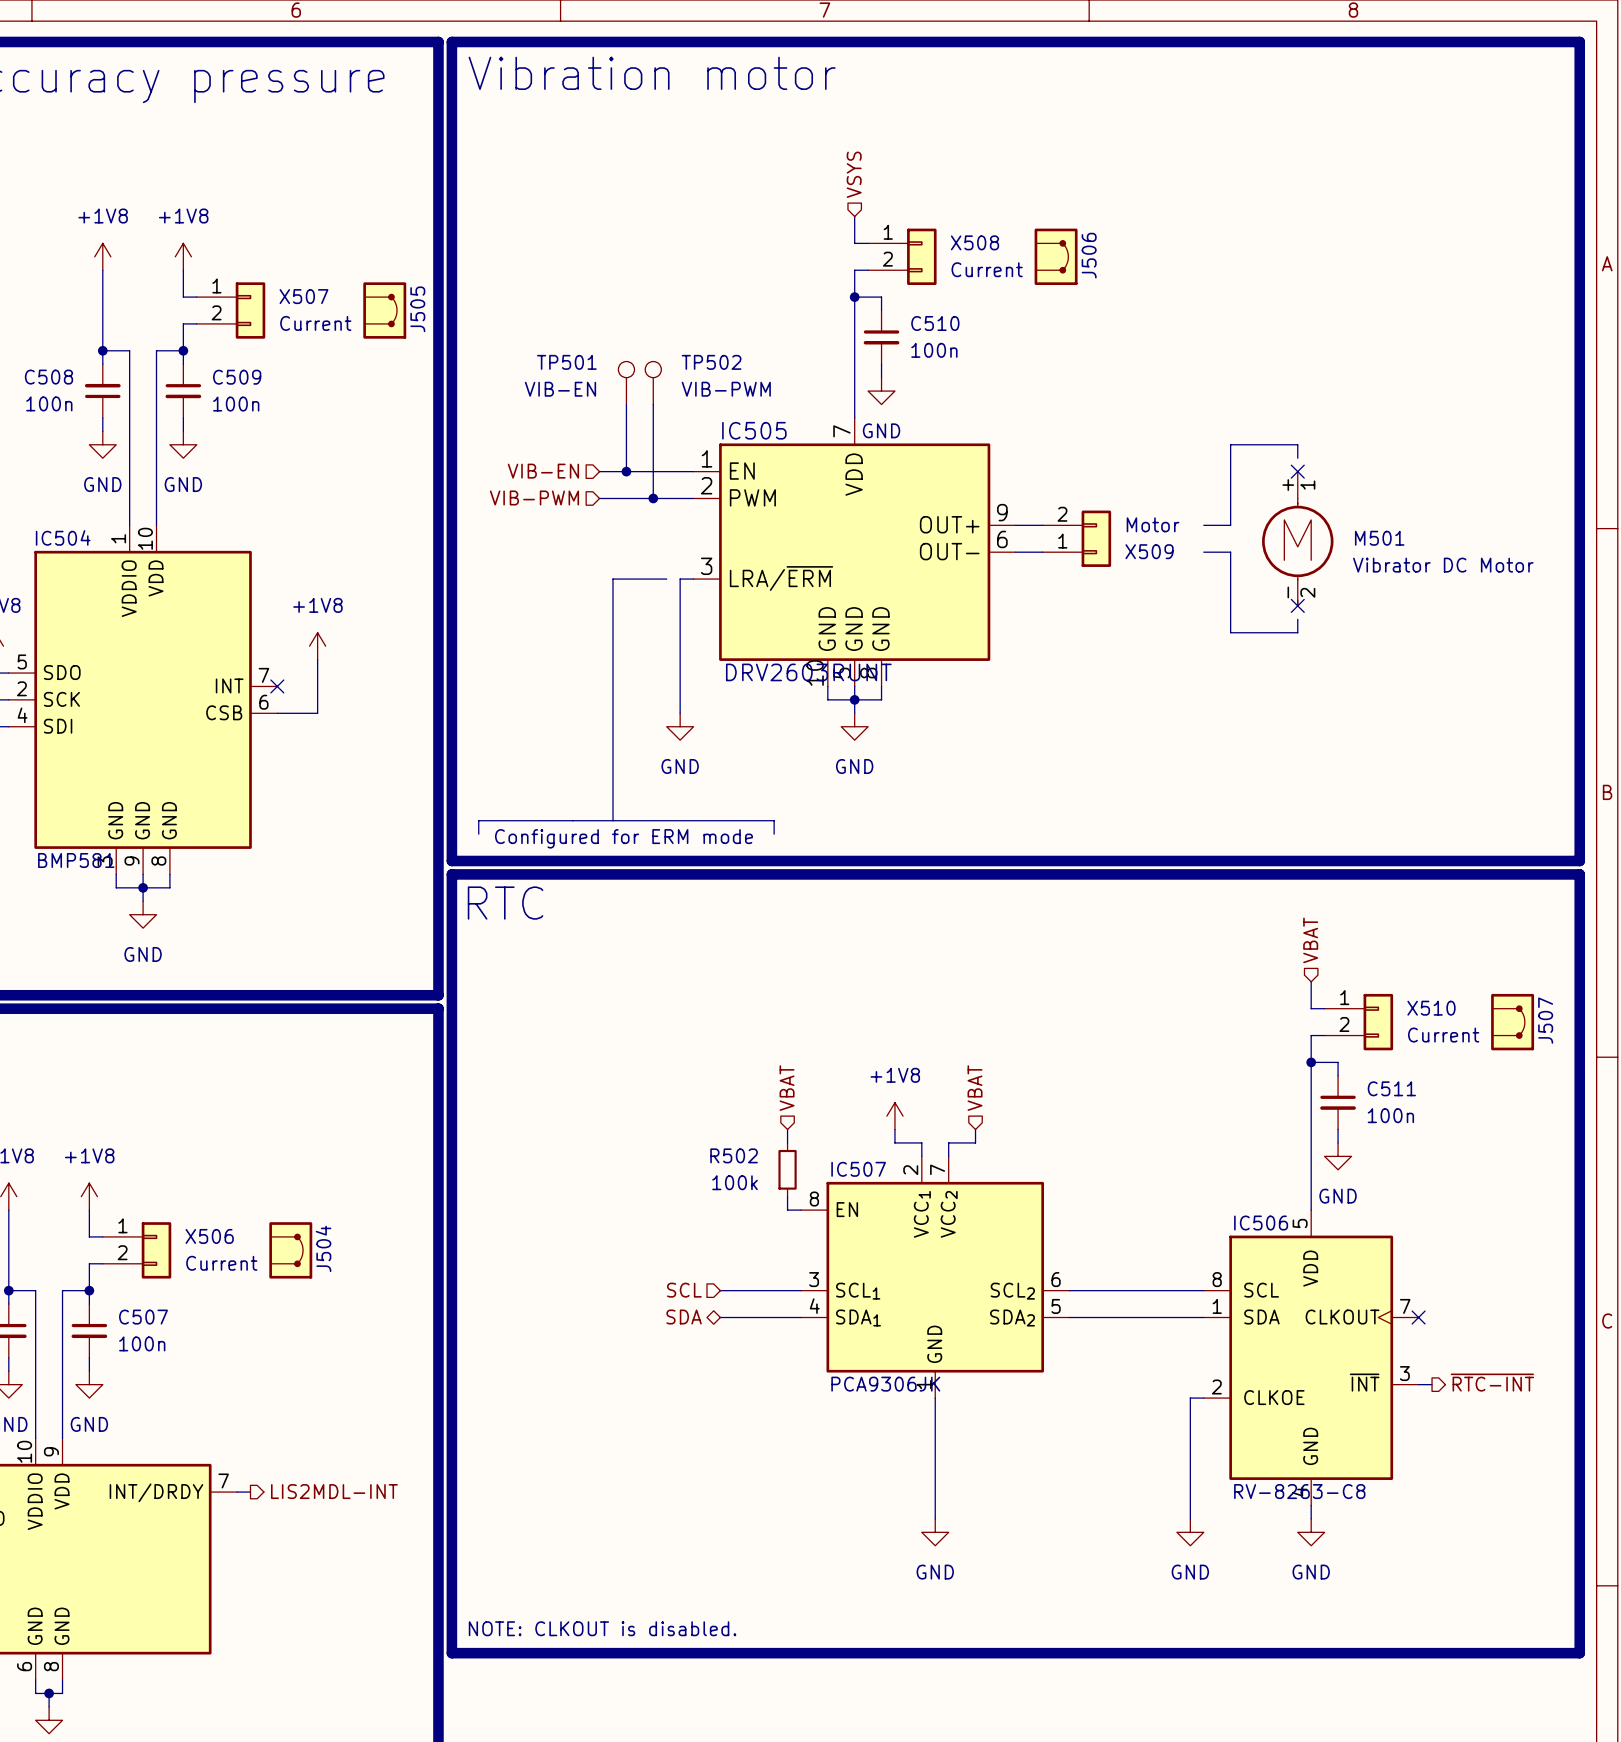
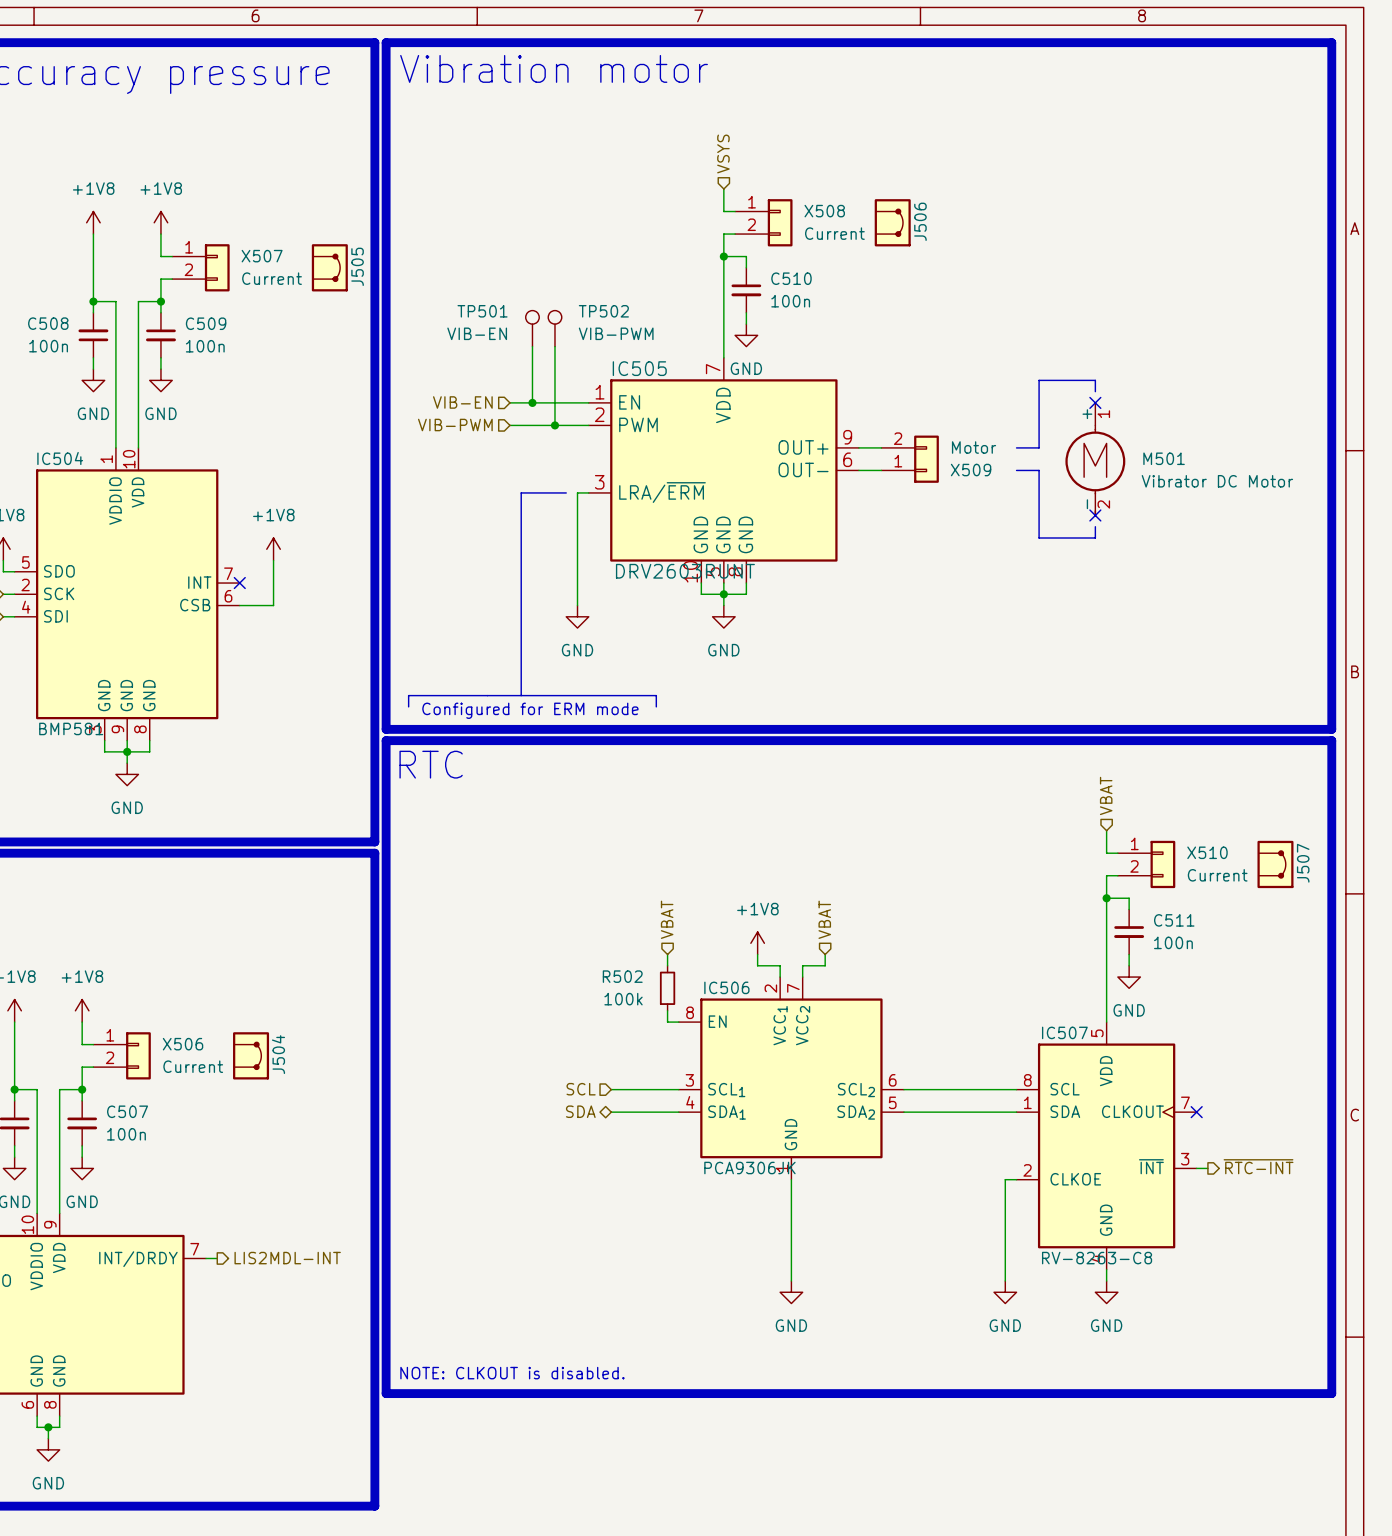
IC507 name: IC507 (858, 1169) -> IC506 (726, 987)
IC506 name: IC506 (1261, 1223) -> IC507 (1064, 1032)

